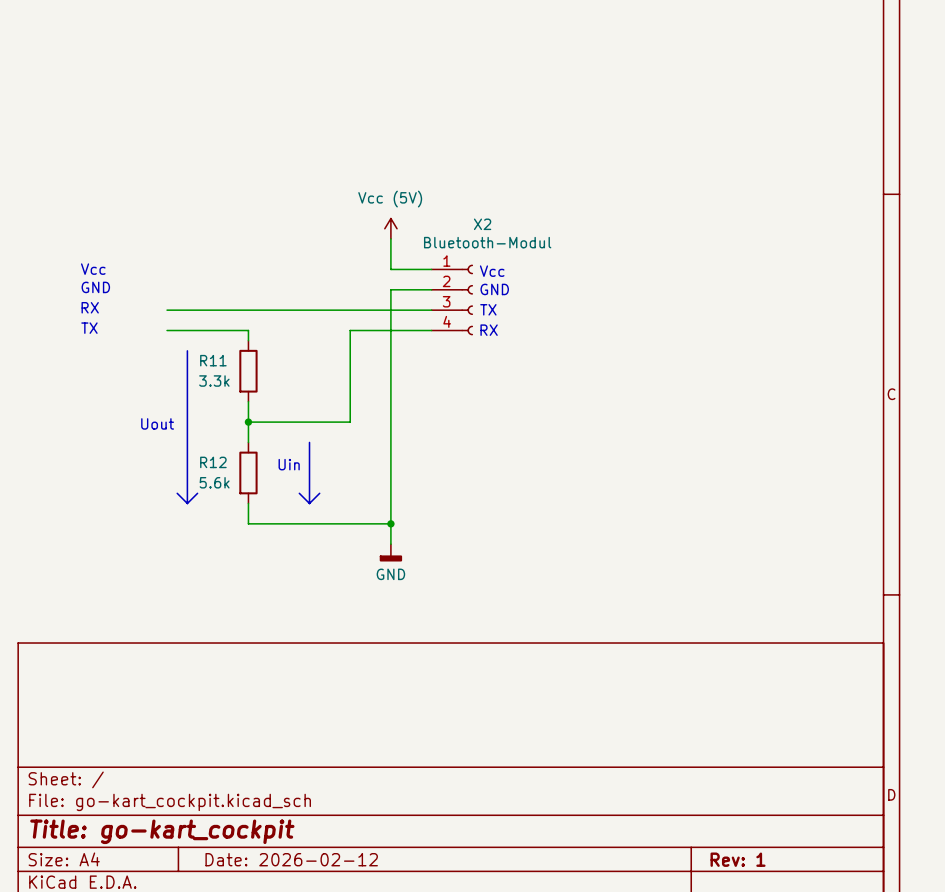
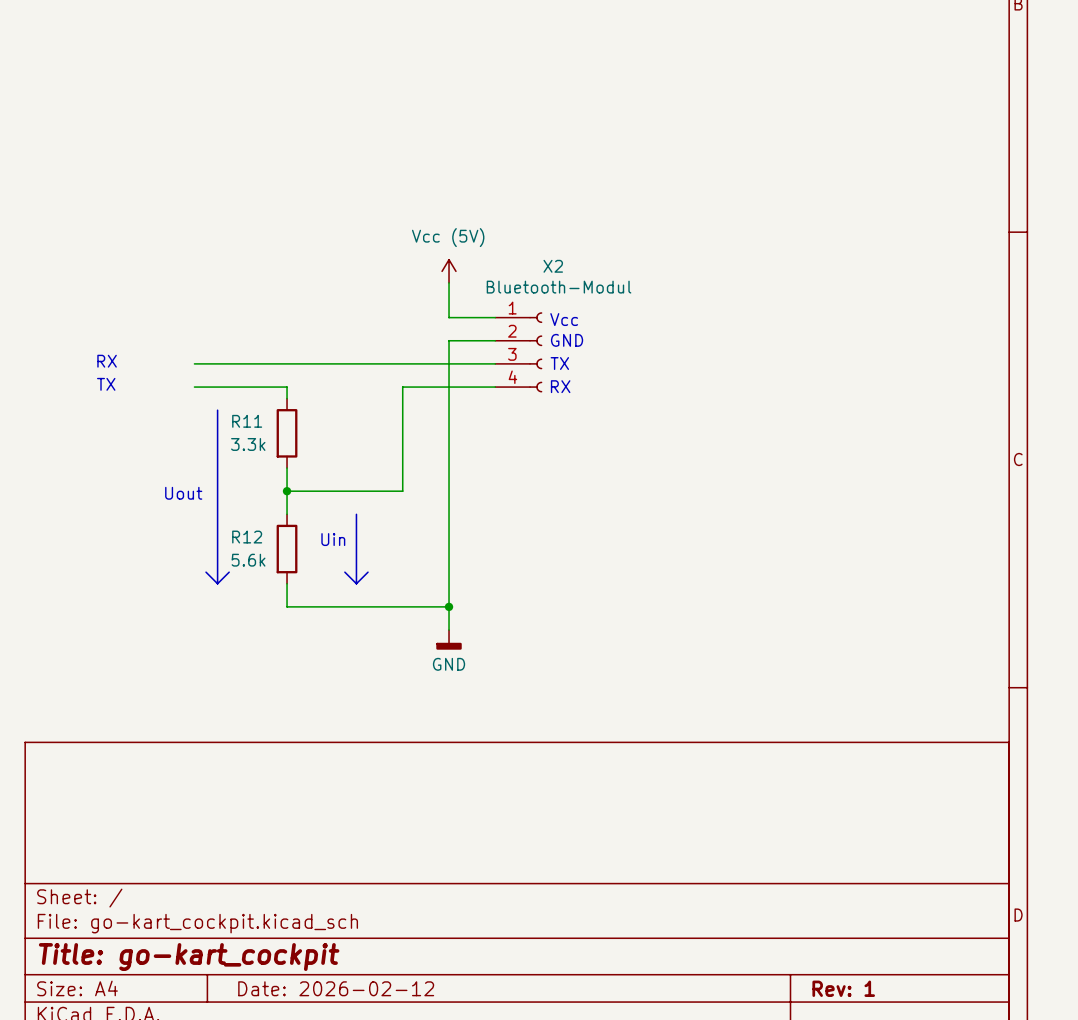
text: Vcc (93, 269) -> none
text: GND (95, 287) -> none

